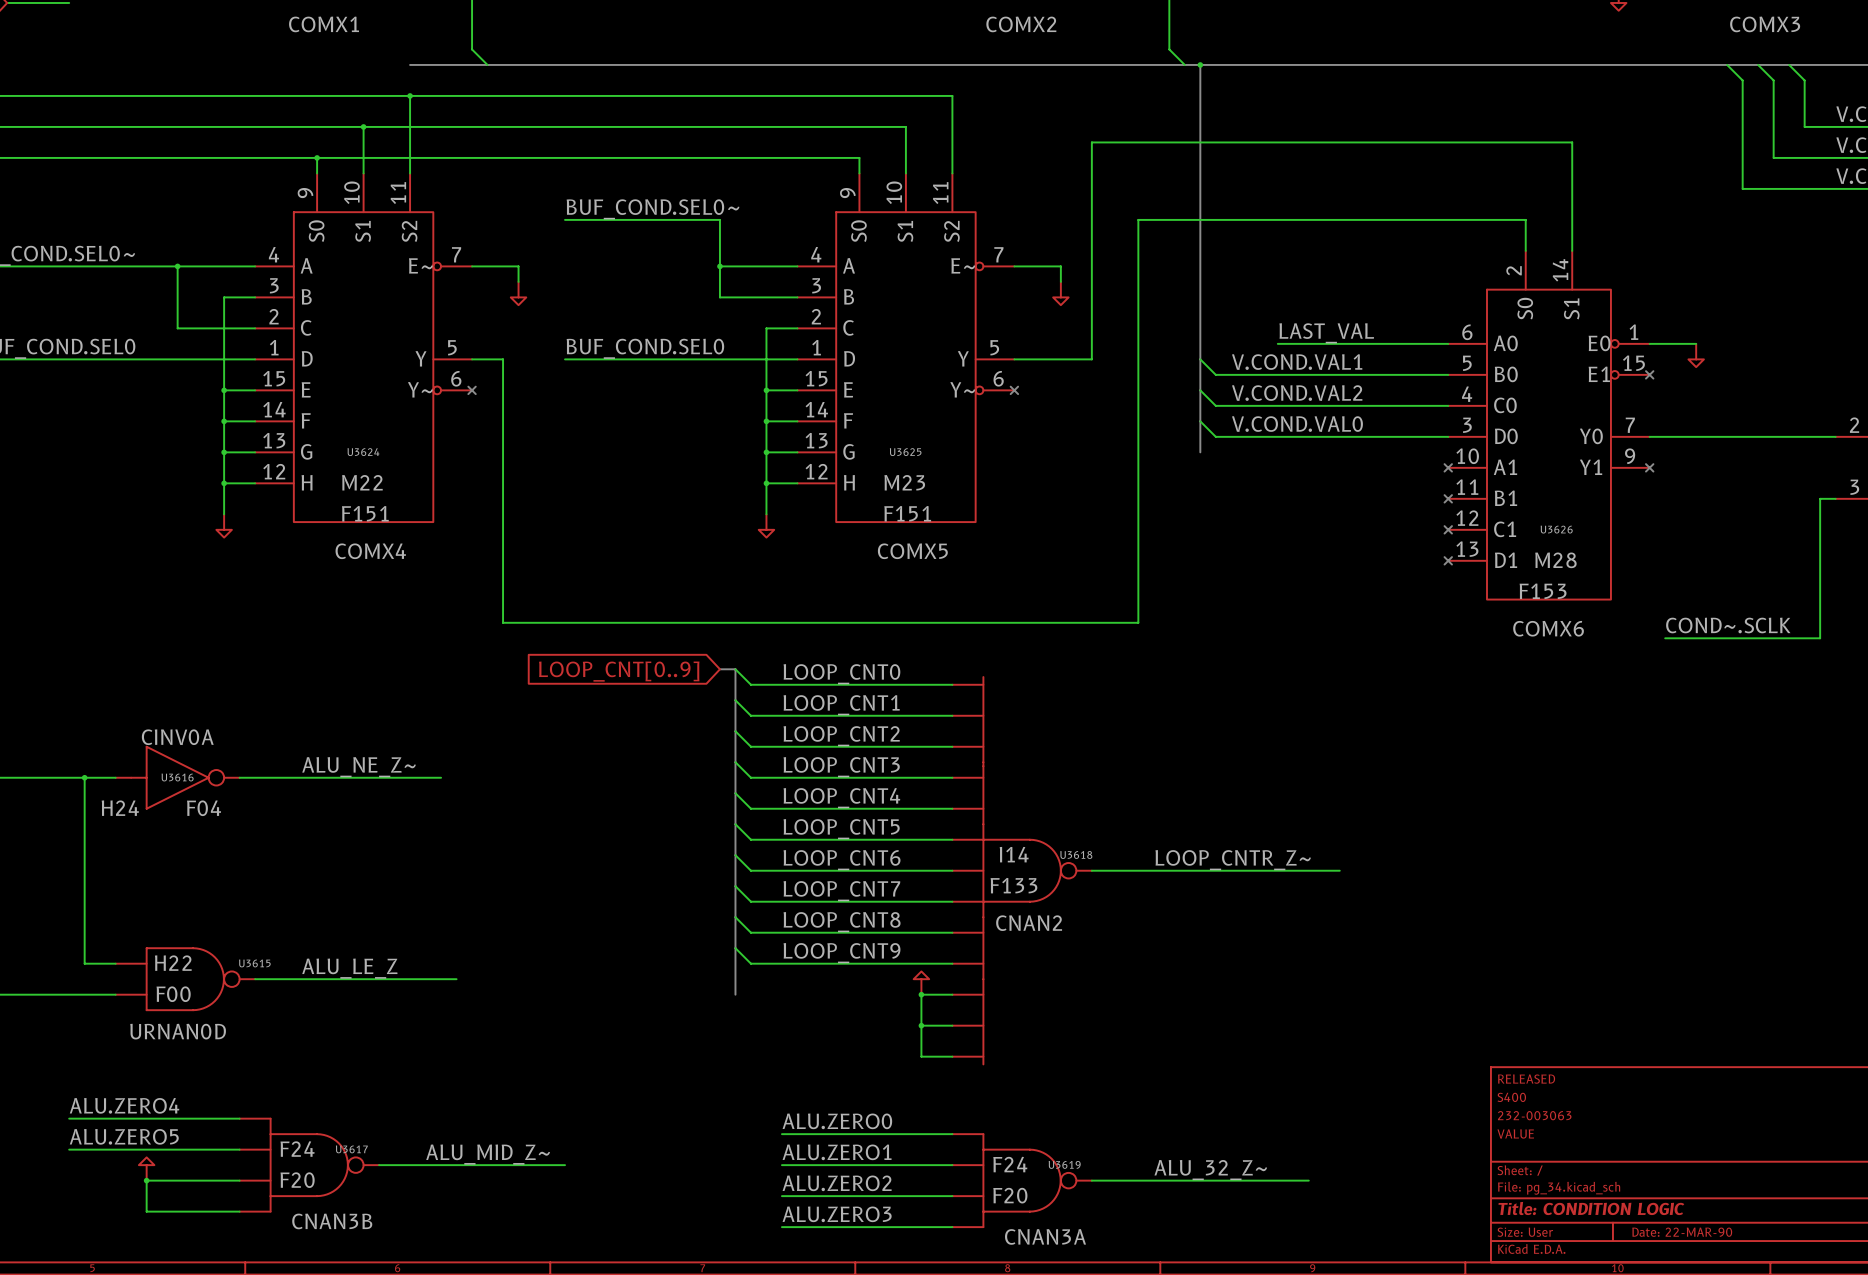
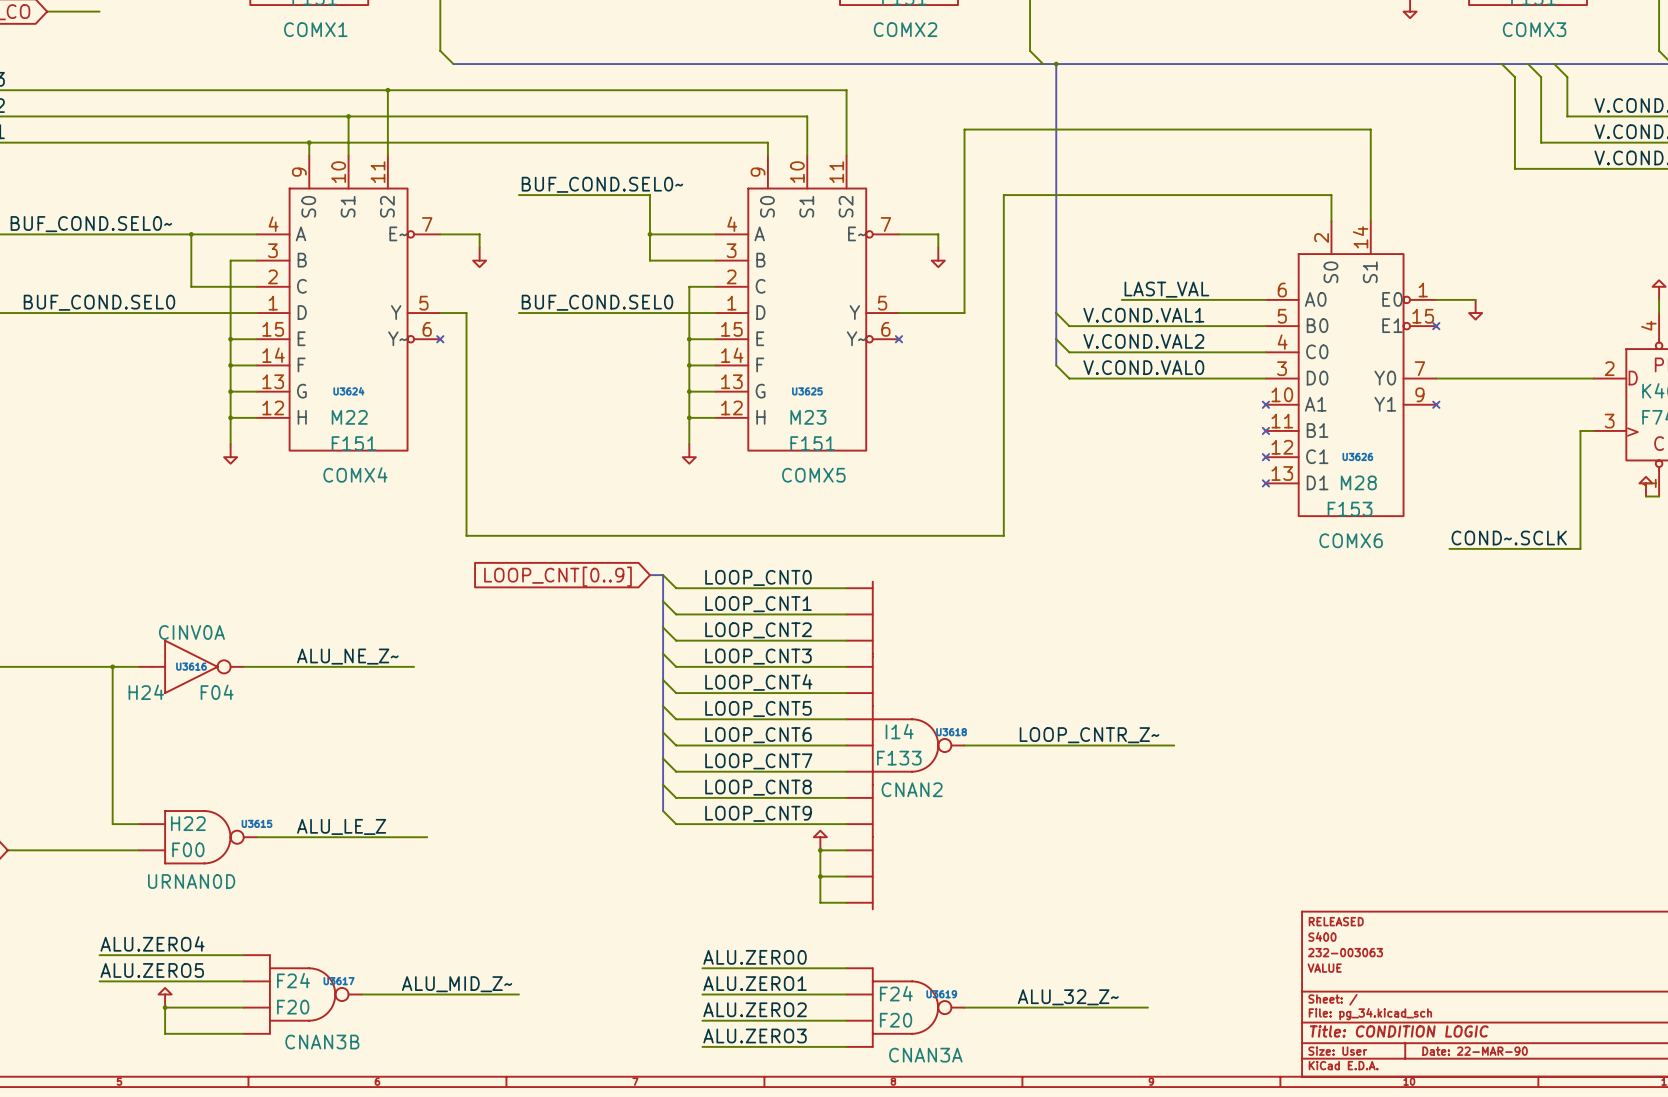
bus: (410, 64) (487, 64) -> none
bus: (1200, 421) (1200, 452) -> none
bus: (735, 948) (735, 994) -> none

